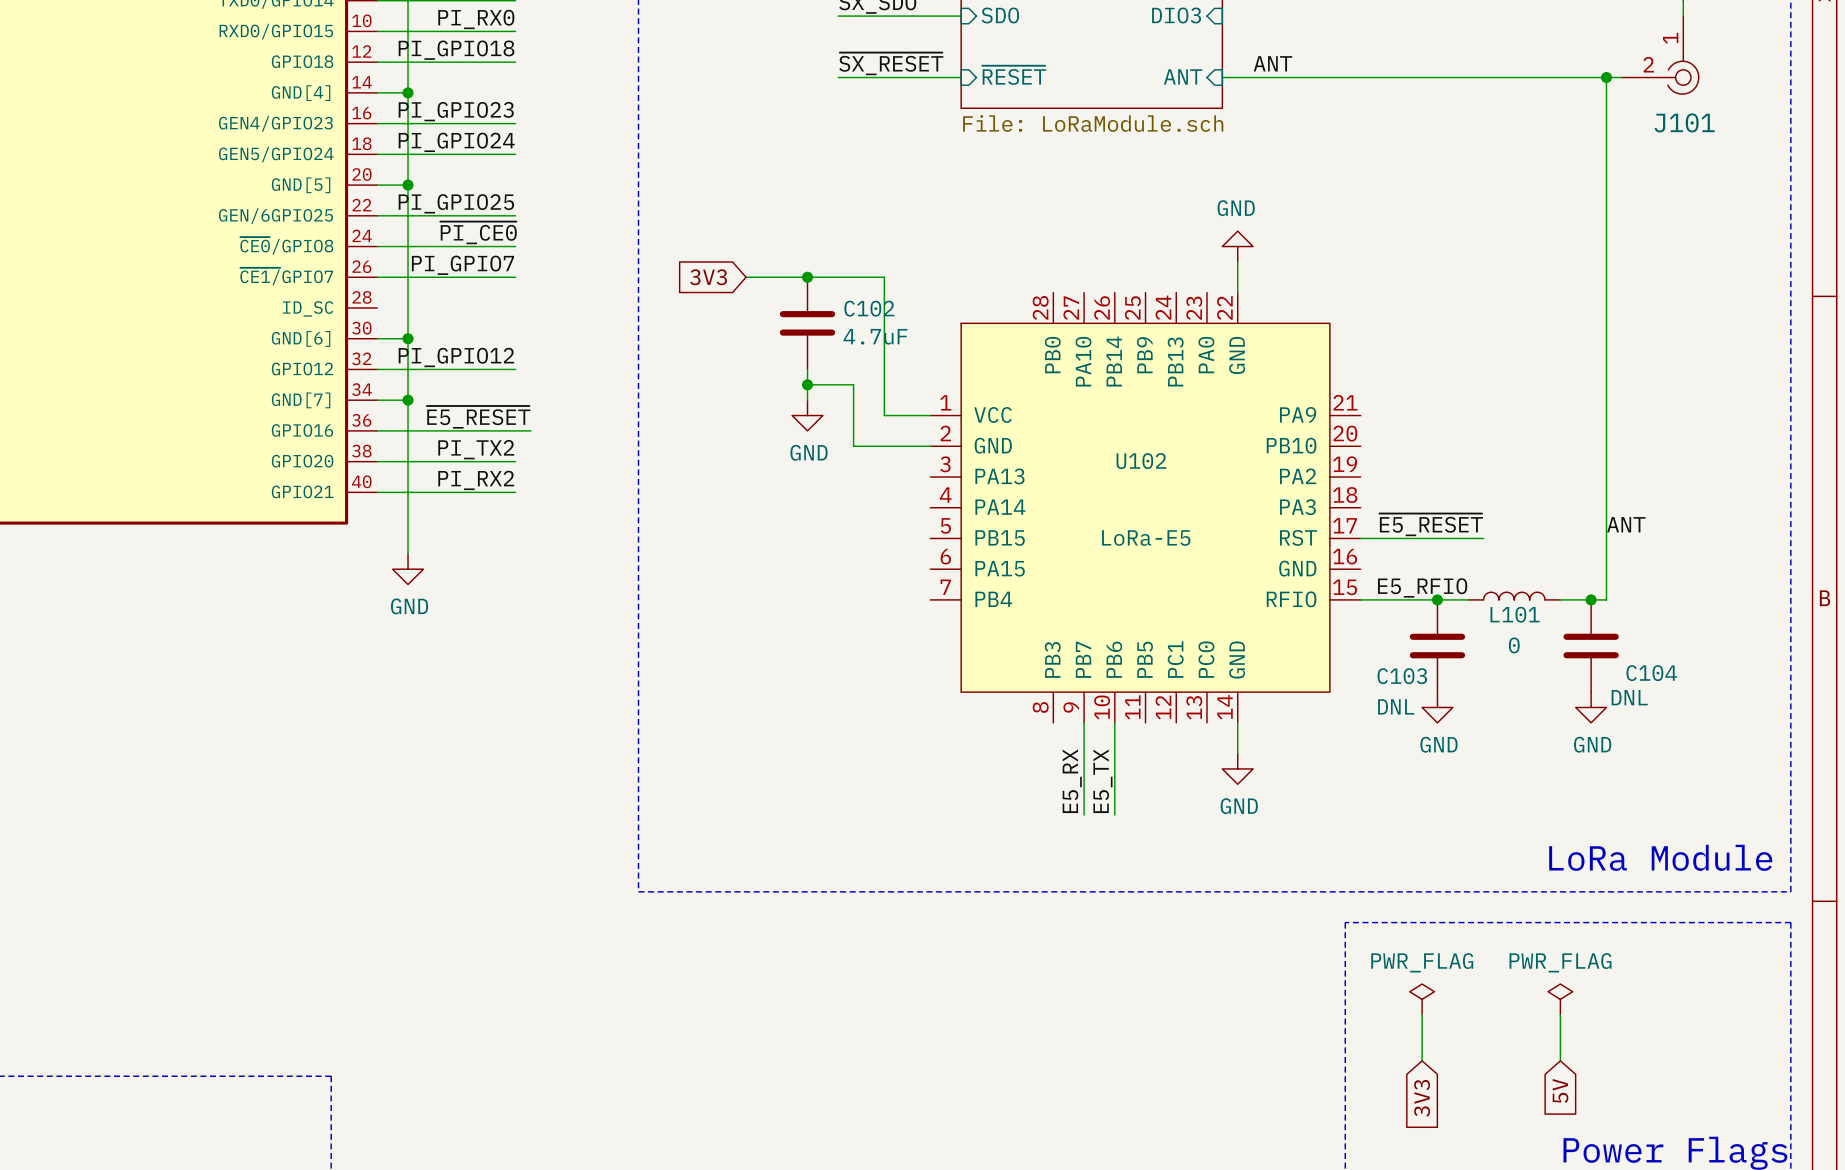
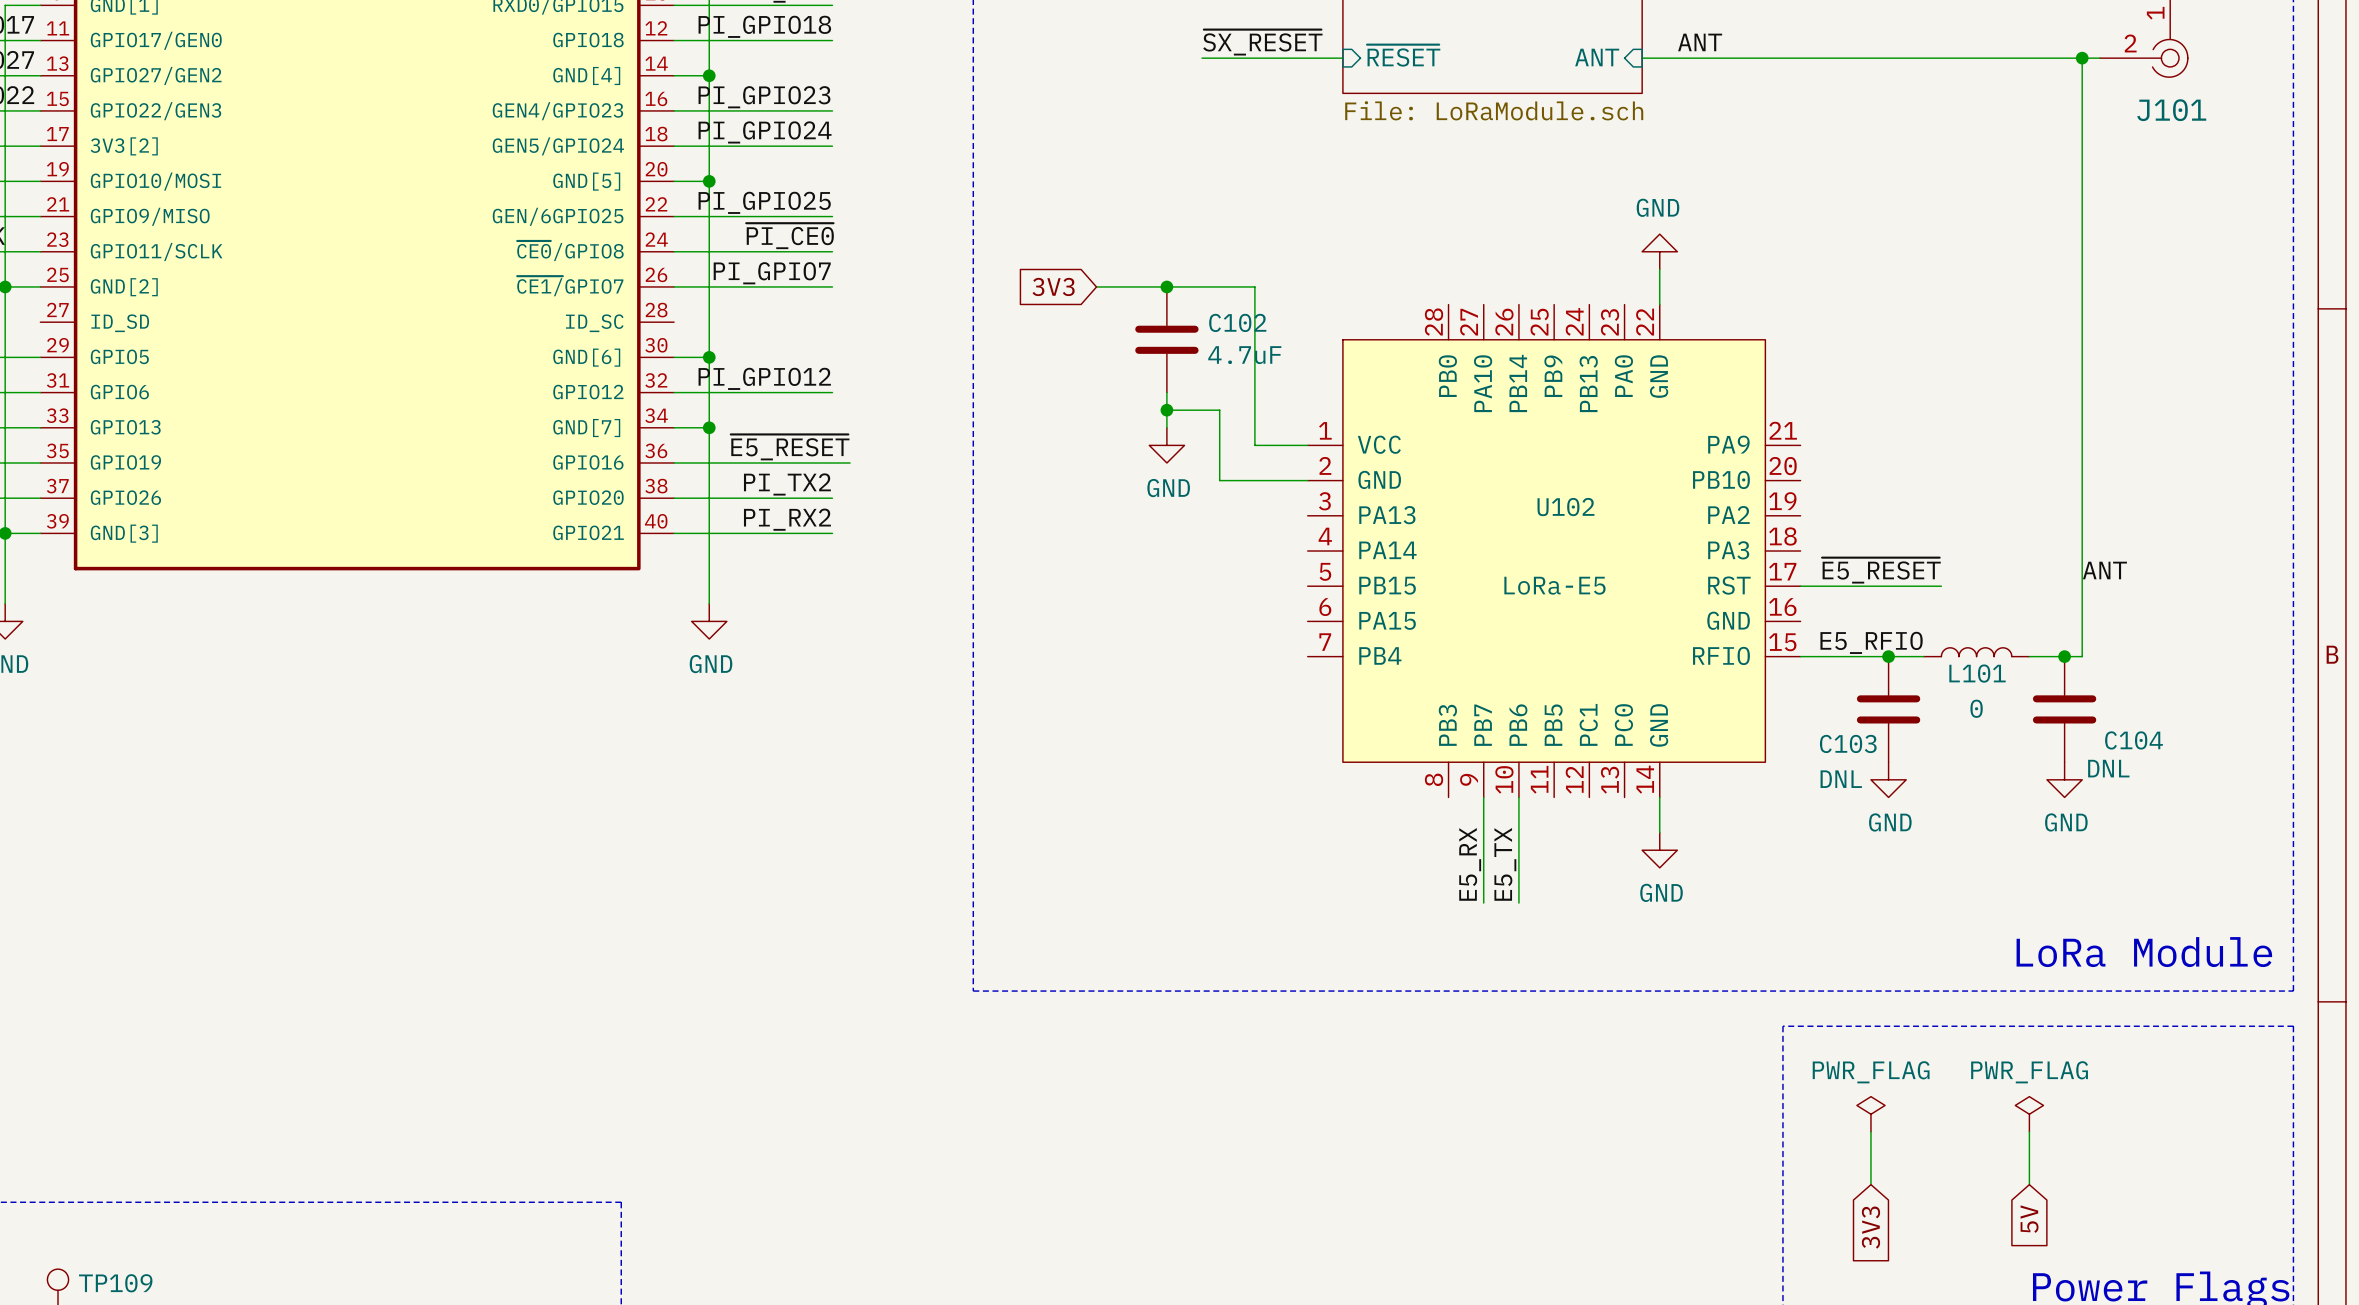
U102 name position: U102 (1141, 461) -> U102 (1565, 507)

